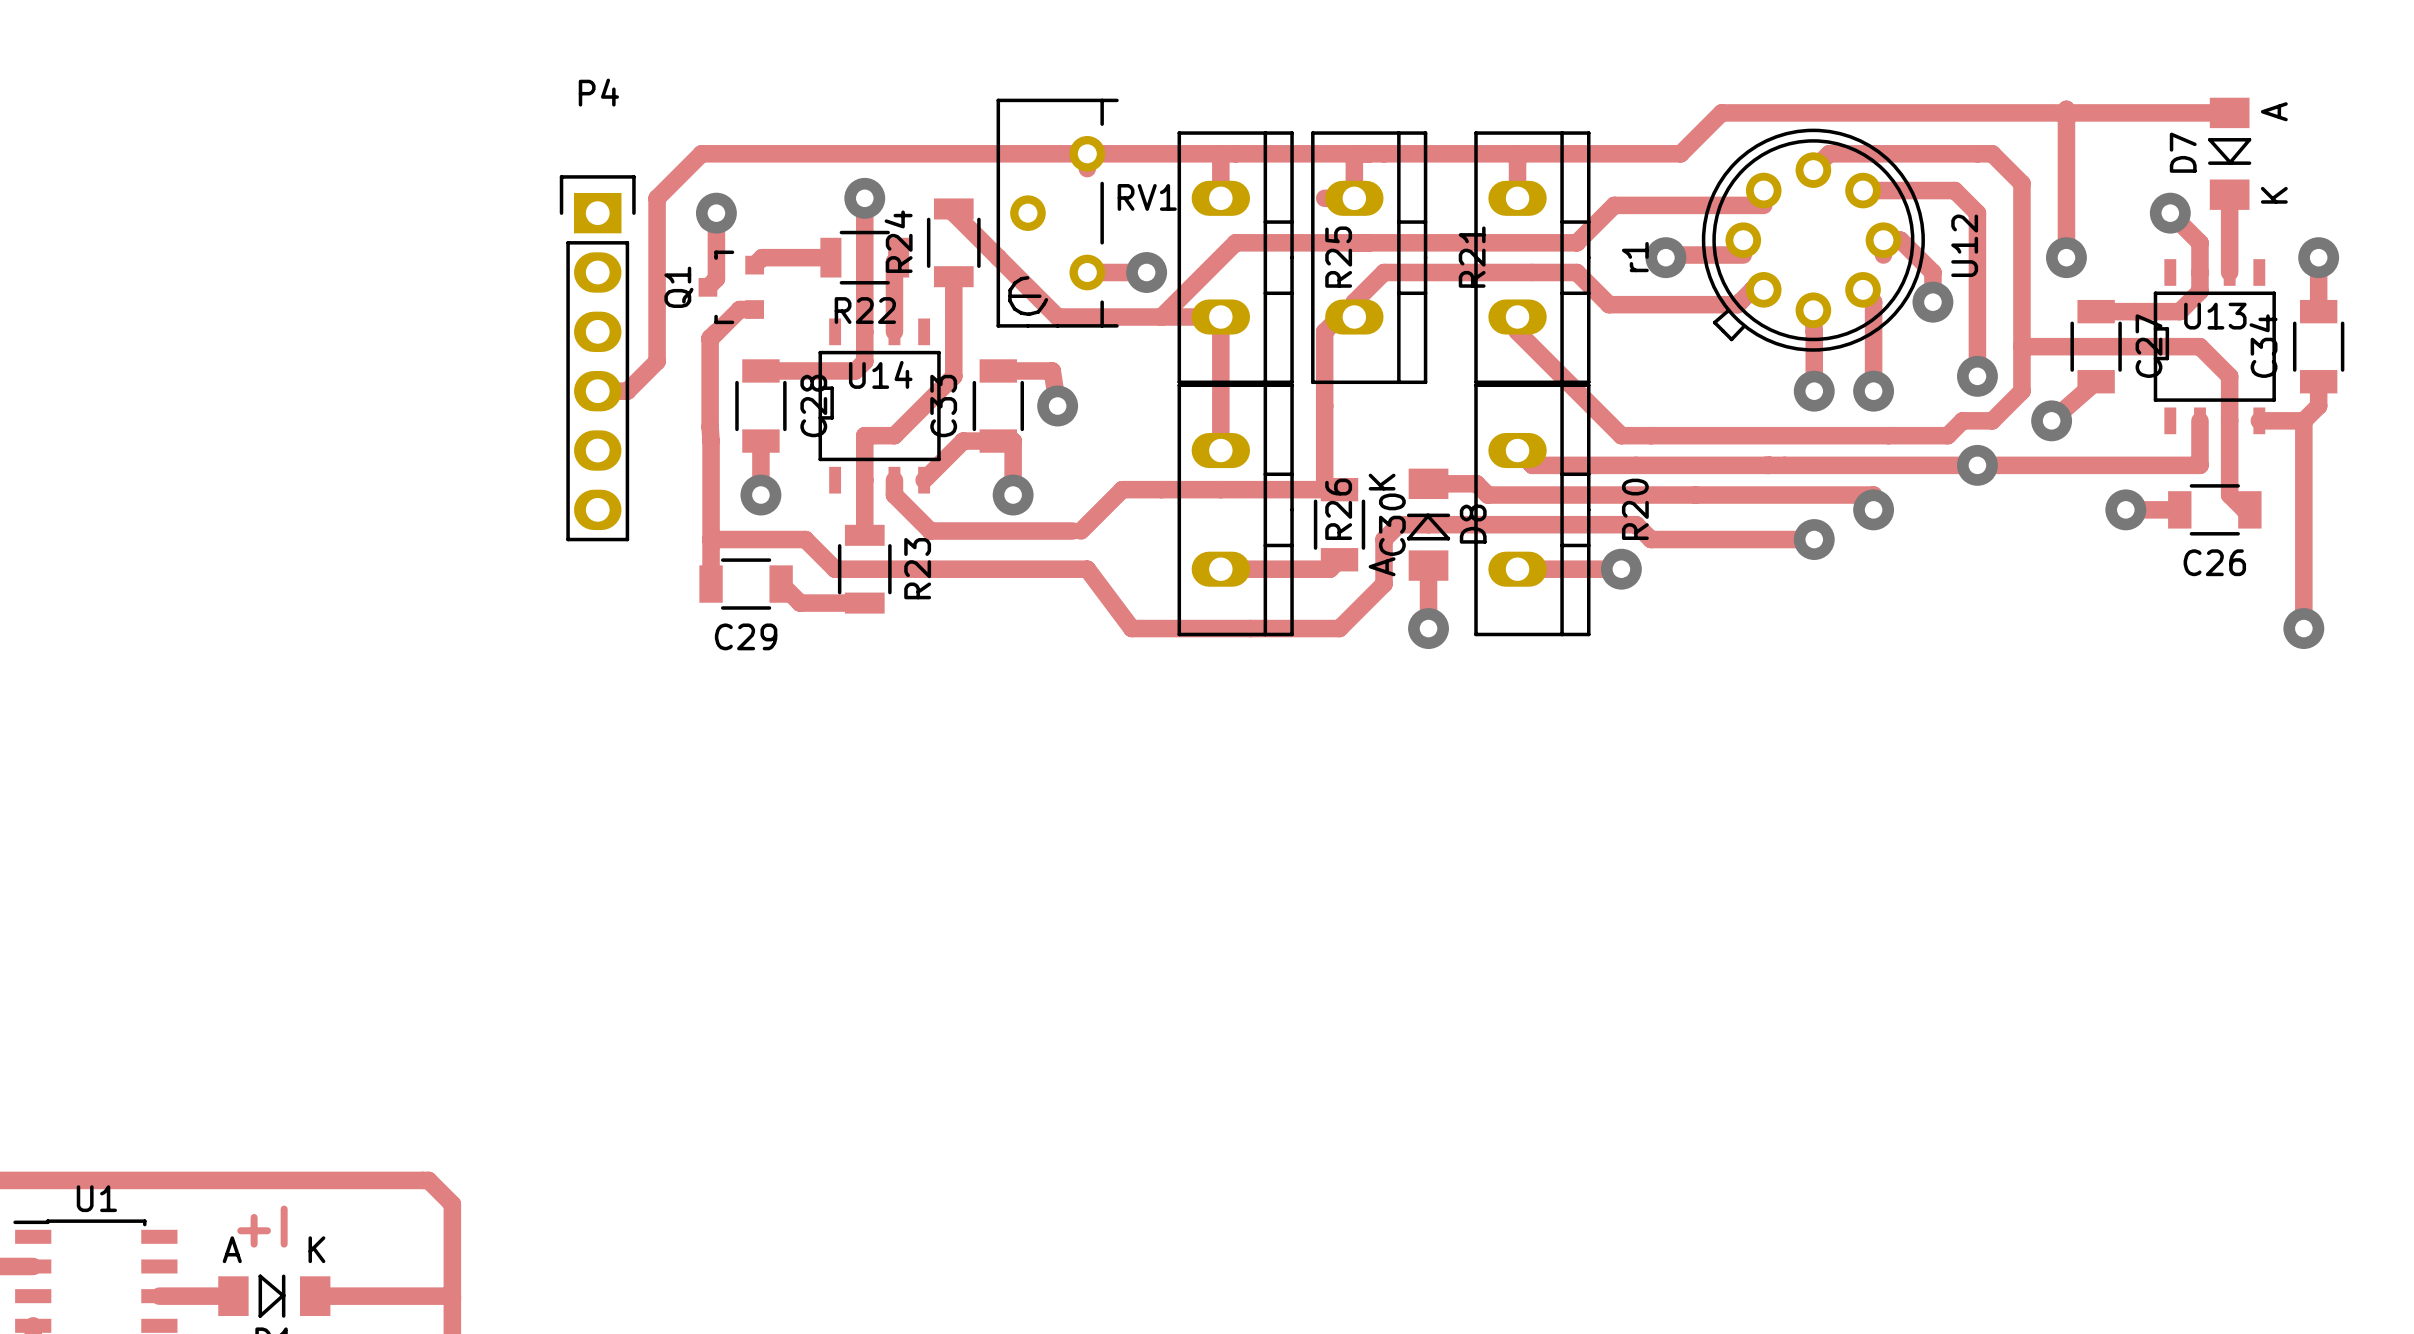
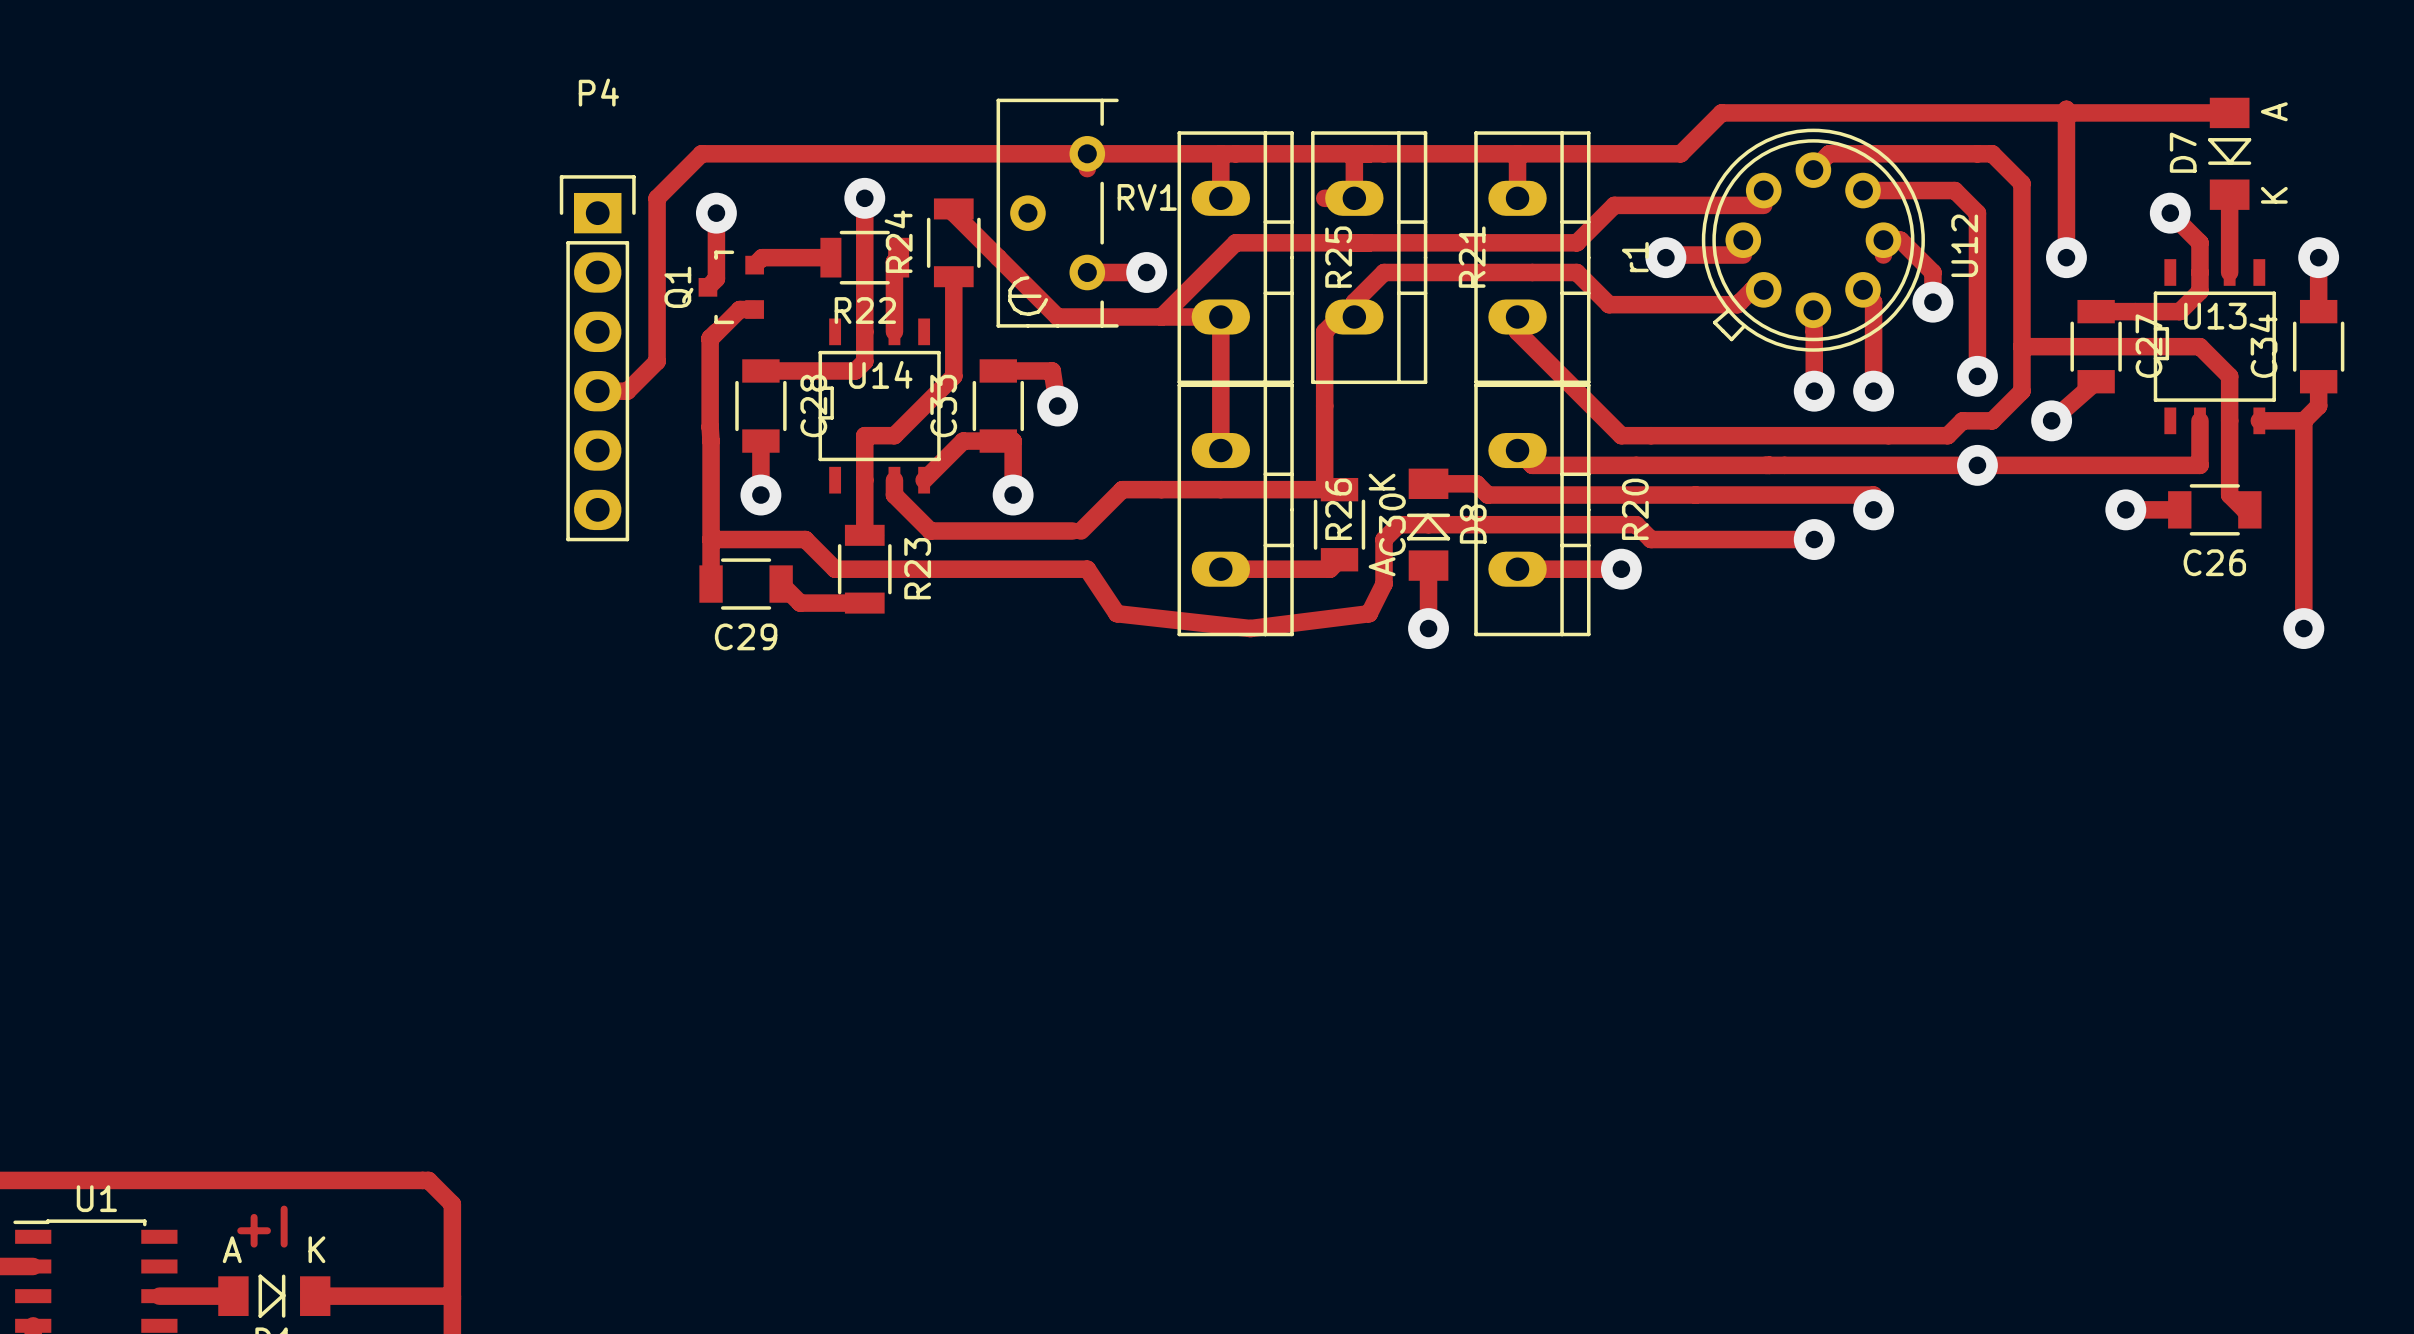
track: (1087, 569) (1131, 628) (1339, 628) (1384, 584) -> (1087, 569) (1116, 613) (1250, 628) (1369, 613) (1384, 584)

